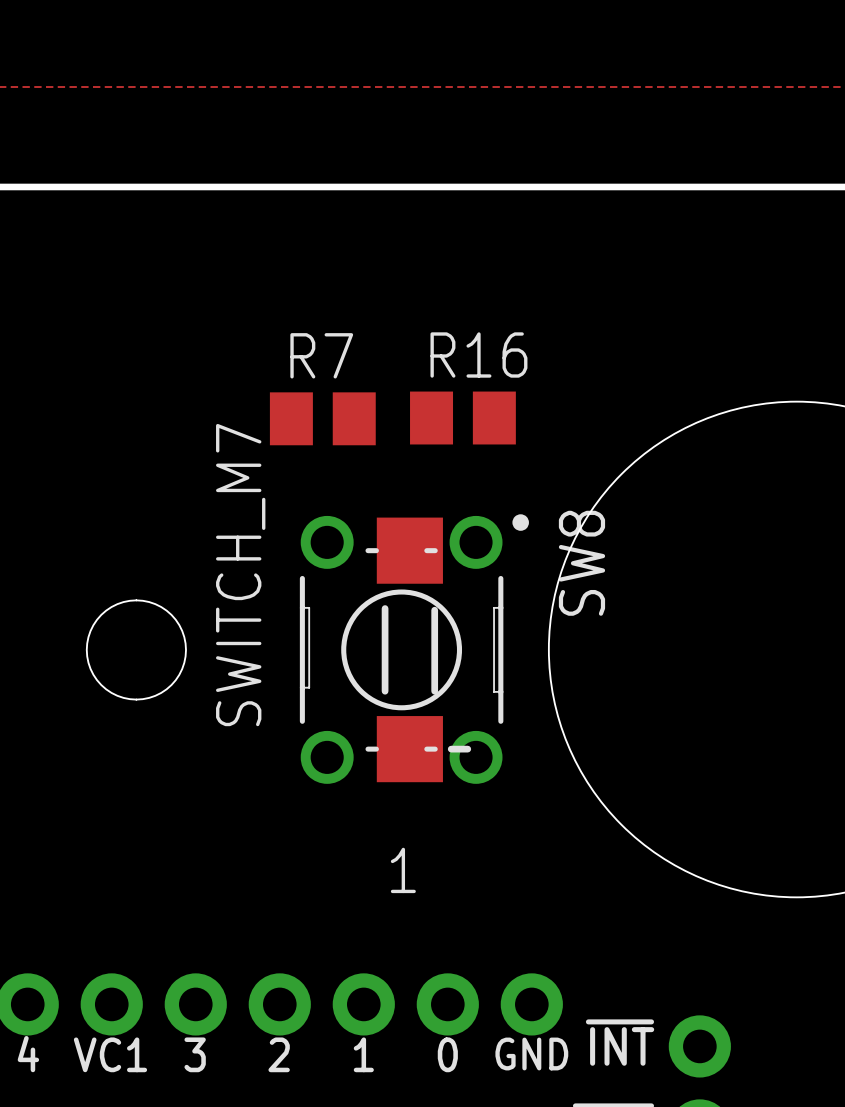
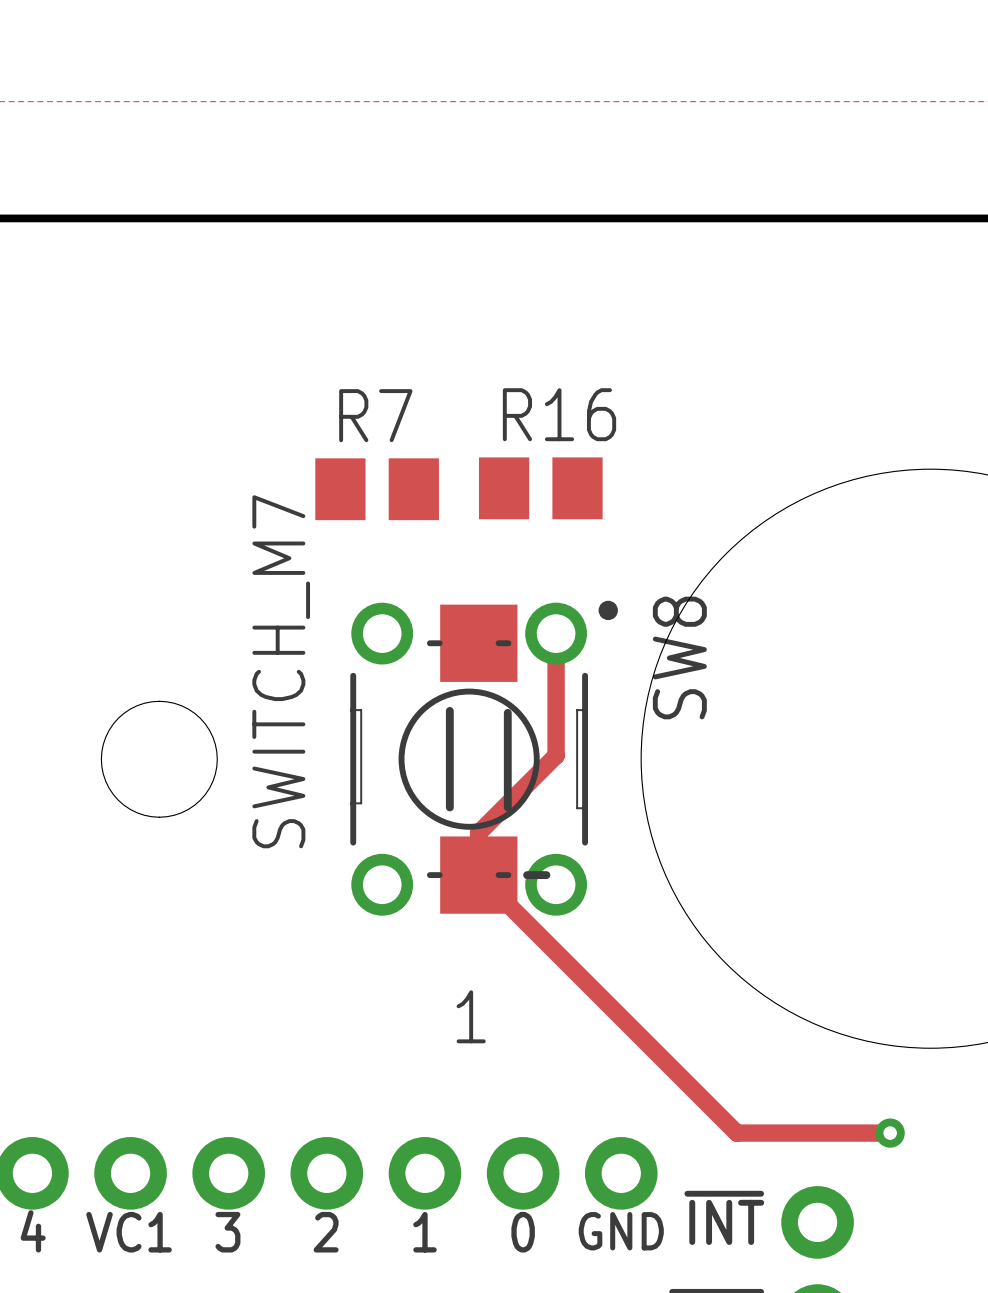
track: none -> (556, 633) (556, 755) (478, 832) (478, 875) (736, 1133) (890, 1133)
via: none -> (890, 1133)

